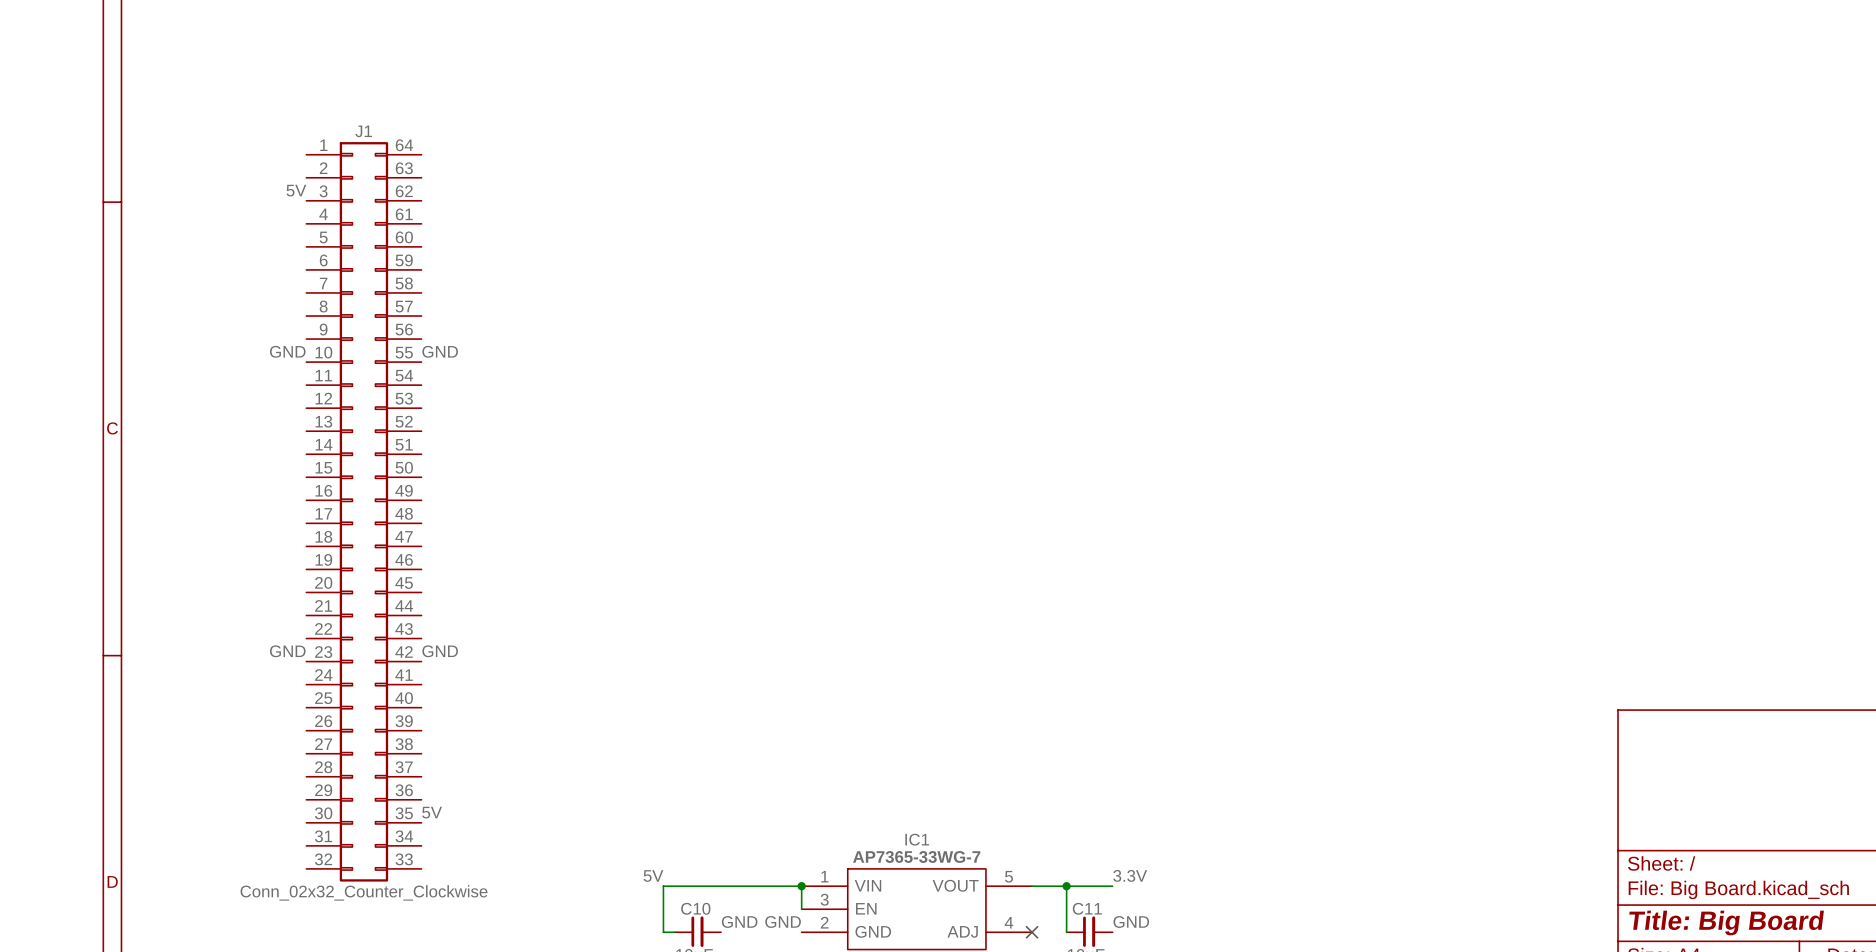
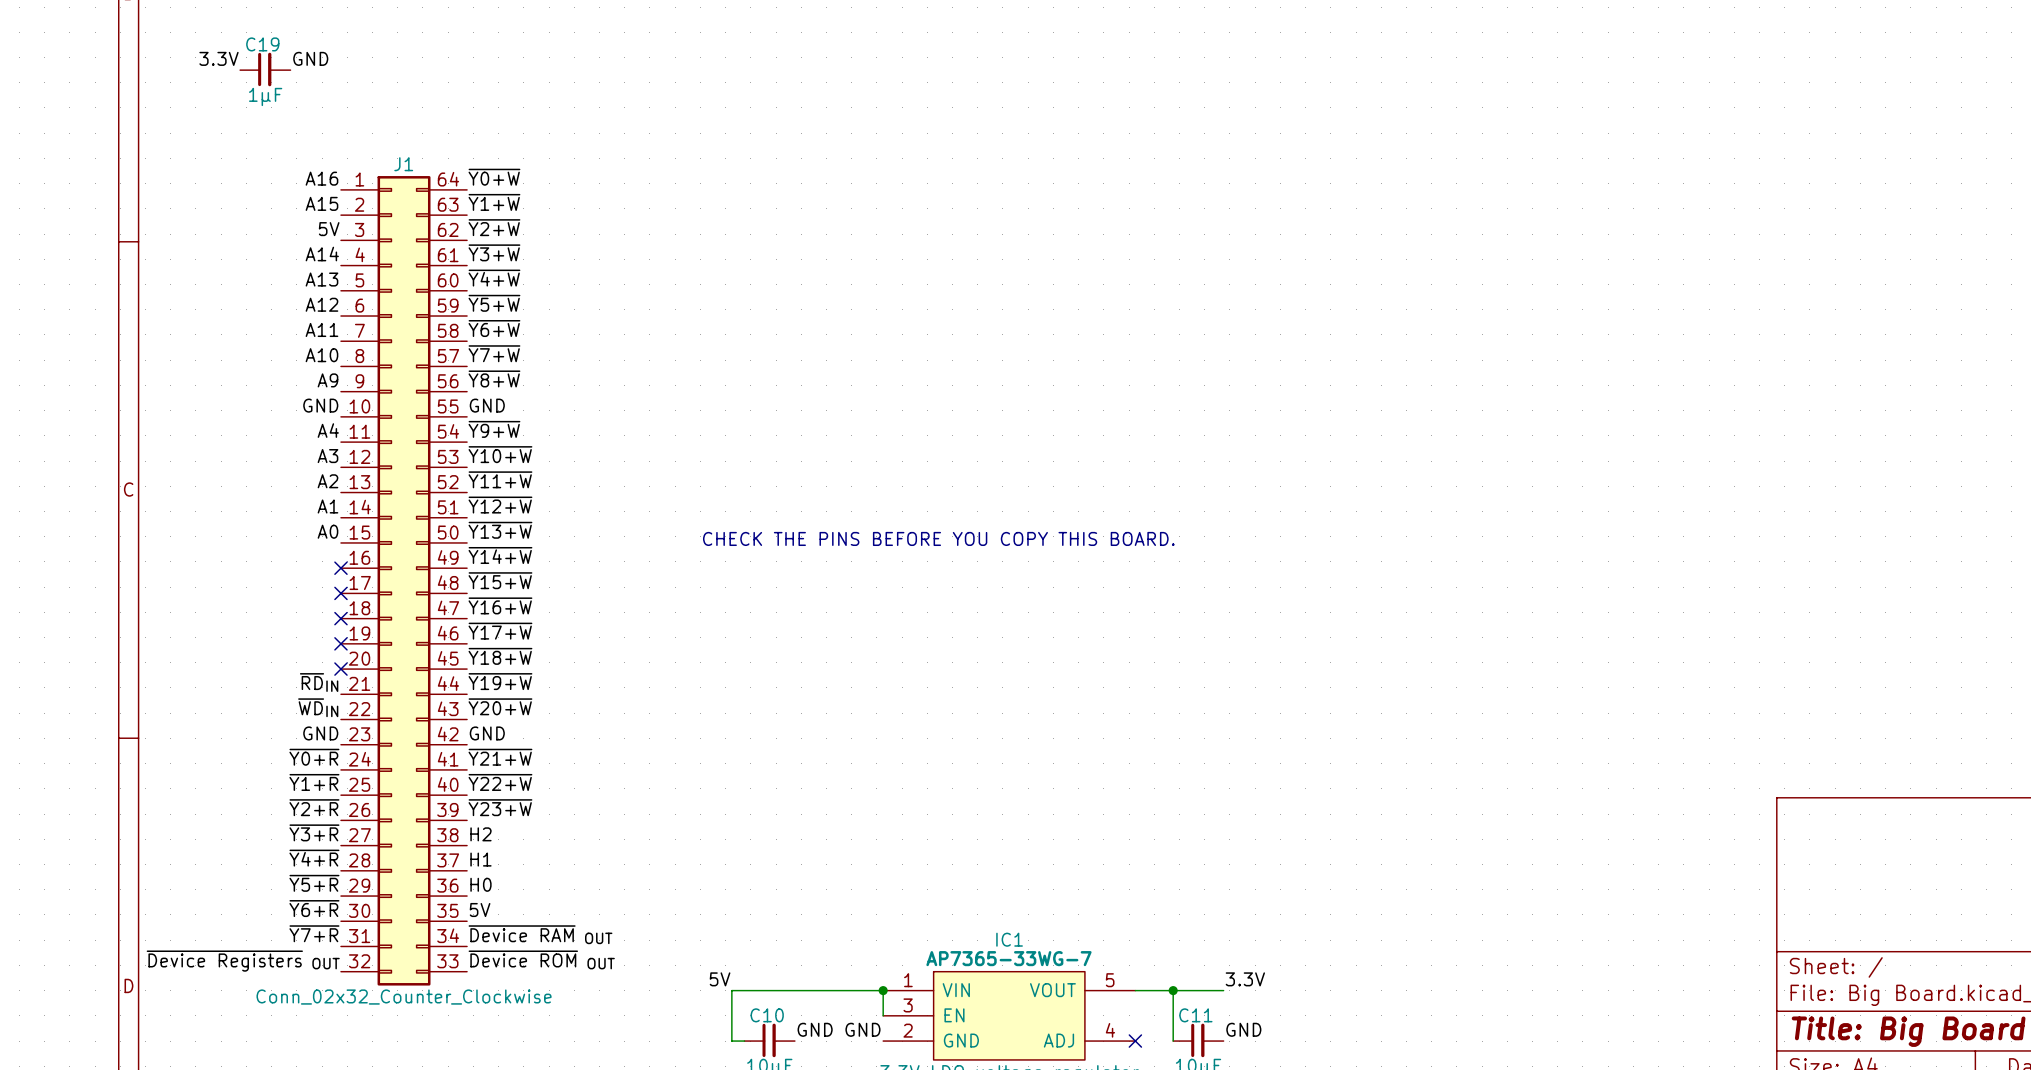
label: none -> 3.3V (218, 58)
label: none -> GND (310, 58)
C19: none -> 1μF (265, 69)
label: none -> ~{Y0+W} (494, 177)
label: none -> A16 (321, 178)
label: none -> ~{Y1+W} (494, 202)
label: none -> A15 (321, 203)
label: none -> ~{Y2+W} (494, 227)
label: none -> ~{Y3+W} (494, 252)
label: none -> A14 (322, 254)
label: none -> ~{Y4+W} (494, 278)
label: none -> A13 (321, 279)
label: none -> ~{Y5+W} (494, 303)
label: none -> A12 (321, 304)
label: none -> ~{Y6+W} (494, 328)
label: none -> A11 (321, 329)
label: none -> ~{Y7+W} (494, 353)
label: none -> A10 (321, 355)
label: none -> ~{Y8+W} (494, 378)
label: none -> A9 (327, 380)
label: none -> ~{Y9+W} (494, 429)
label: none -> A4 (328, 430)
label: none -> ~{Y10+W} (500, 454)
label: none -> A3 (327, 456)
label: none -> ~{Y11+W} (500, 479)
label: none -> A2 (327, 481)
label: none -> ~{Y12+W} (500, 505)
label: none -> A1 (327, 506)
label: none -> ~{Y13+W} (500, 530)
label: none -> A0 (327, 531)
text: none -> CHECK THE PINS BEFORE YOU COPY THIS BOARD. (938, 538)
label: none -> ~{Y14+W} (500, 555)
no-connect mark: none -> (340, 568)
label: none -> ~{Y15+W} (500, 580)
no-connect mark: none -> (340, 593)
label: none -> ~{Y16+W} (500, 605)
no-connect mark: none -> (340, 618)
label: none -> ~{Y17+W} (500, 631)
no-connect mark: none -> (340, 643)
label: none -> ~{Y18+W} (500, 656)
no-connect mark: none -> (340, 669)
label: none -> ~{Y19+W} (500, 681)
label: none -> ~{RD}IN (319, 682)
label: none -> ~{WD}IN (318, 707)
label: none -> ~{Y20+W} (500, 706)
label: none -> ~{Y0+R} (314, 757)
label: none -> ~{Y21+W} (500, 757)
label: none -> ~{Y1+R} (314, 782)
label: none -> ~{Y22+W} (500, 782)
label: none -> ~{Y2+R} (314, 807)
label: none -> ~{Y23+W} (500, 807)
label: none -> ~{Y3+R} (314, 832)
label: none -> H2 (480, 834)
label: none -> ~{Y4+R} (314, 858)
label: none -> H1 (480, 859)
label: none -> ~{Y5+R} (314, 883)
label: none -> H0 (480, 884)
label: none -> ~{Y6+R} (314, 908)
label: none -> ~{Y7+R} (314, 933)
label: none -> ~{Device RAM} OUT (540, 934)
label: none -> ~{Device ROM} OUT (541, 959)
label: none -> ~{Device Registers} OUT (243, 961)

